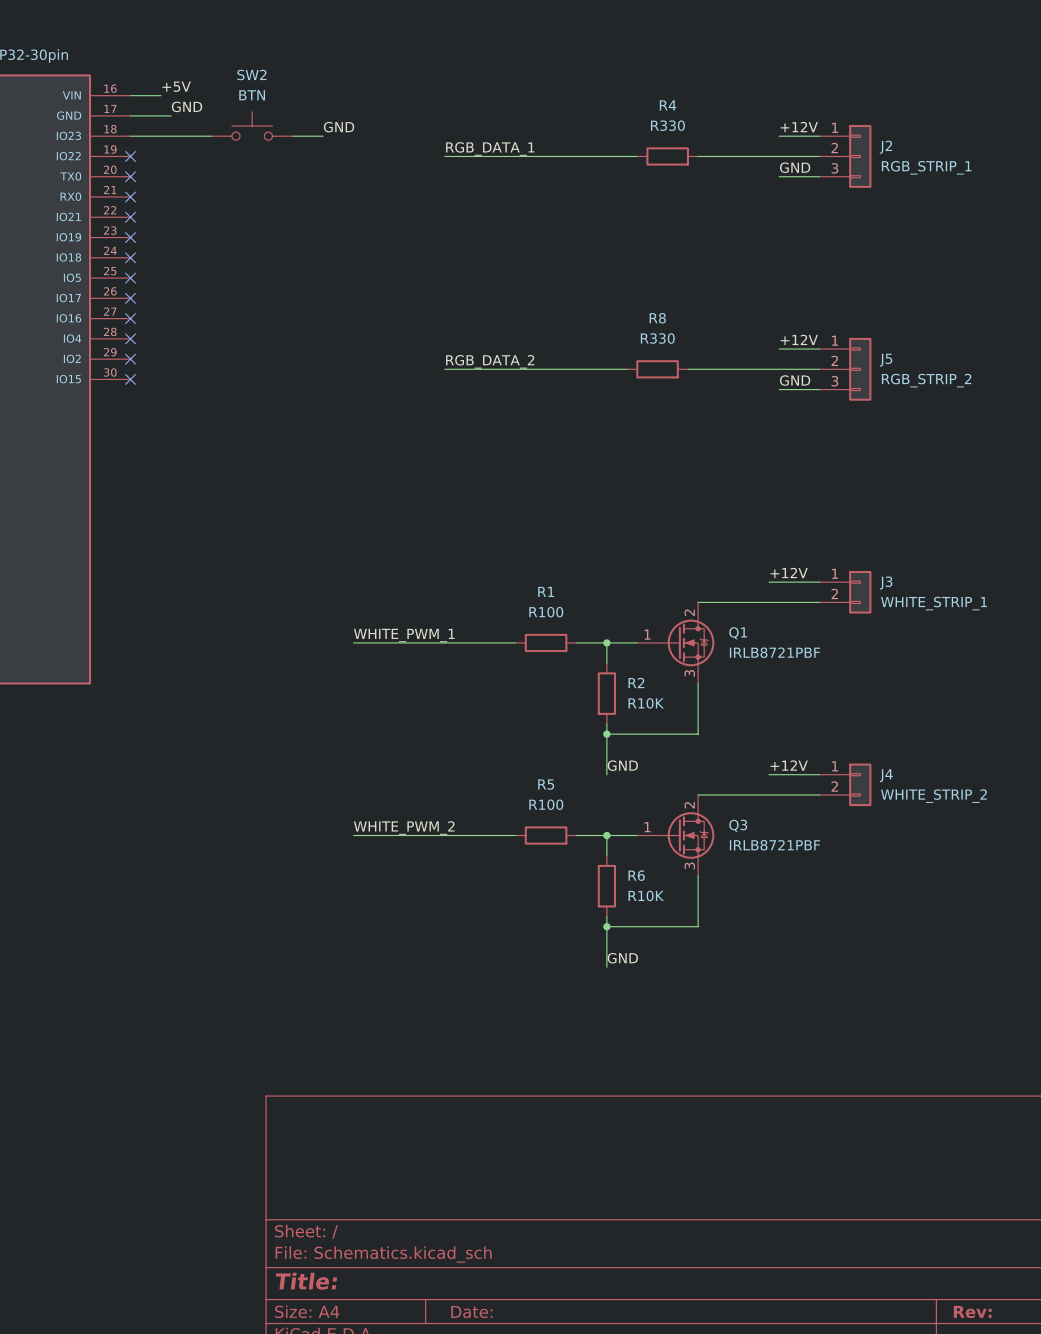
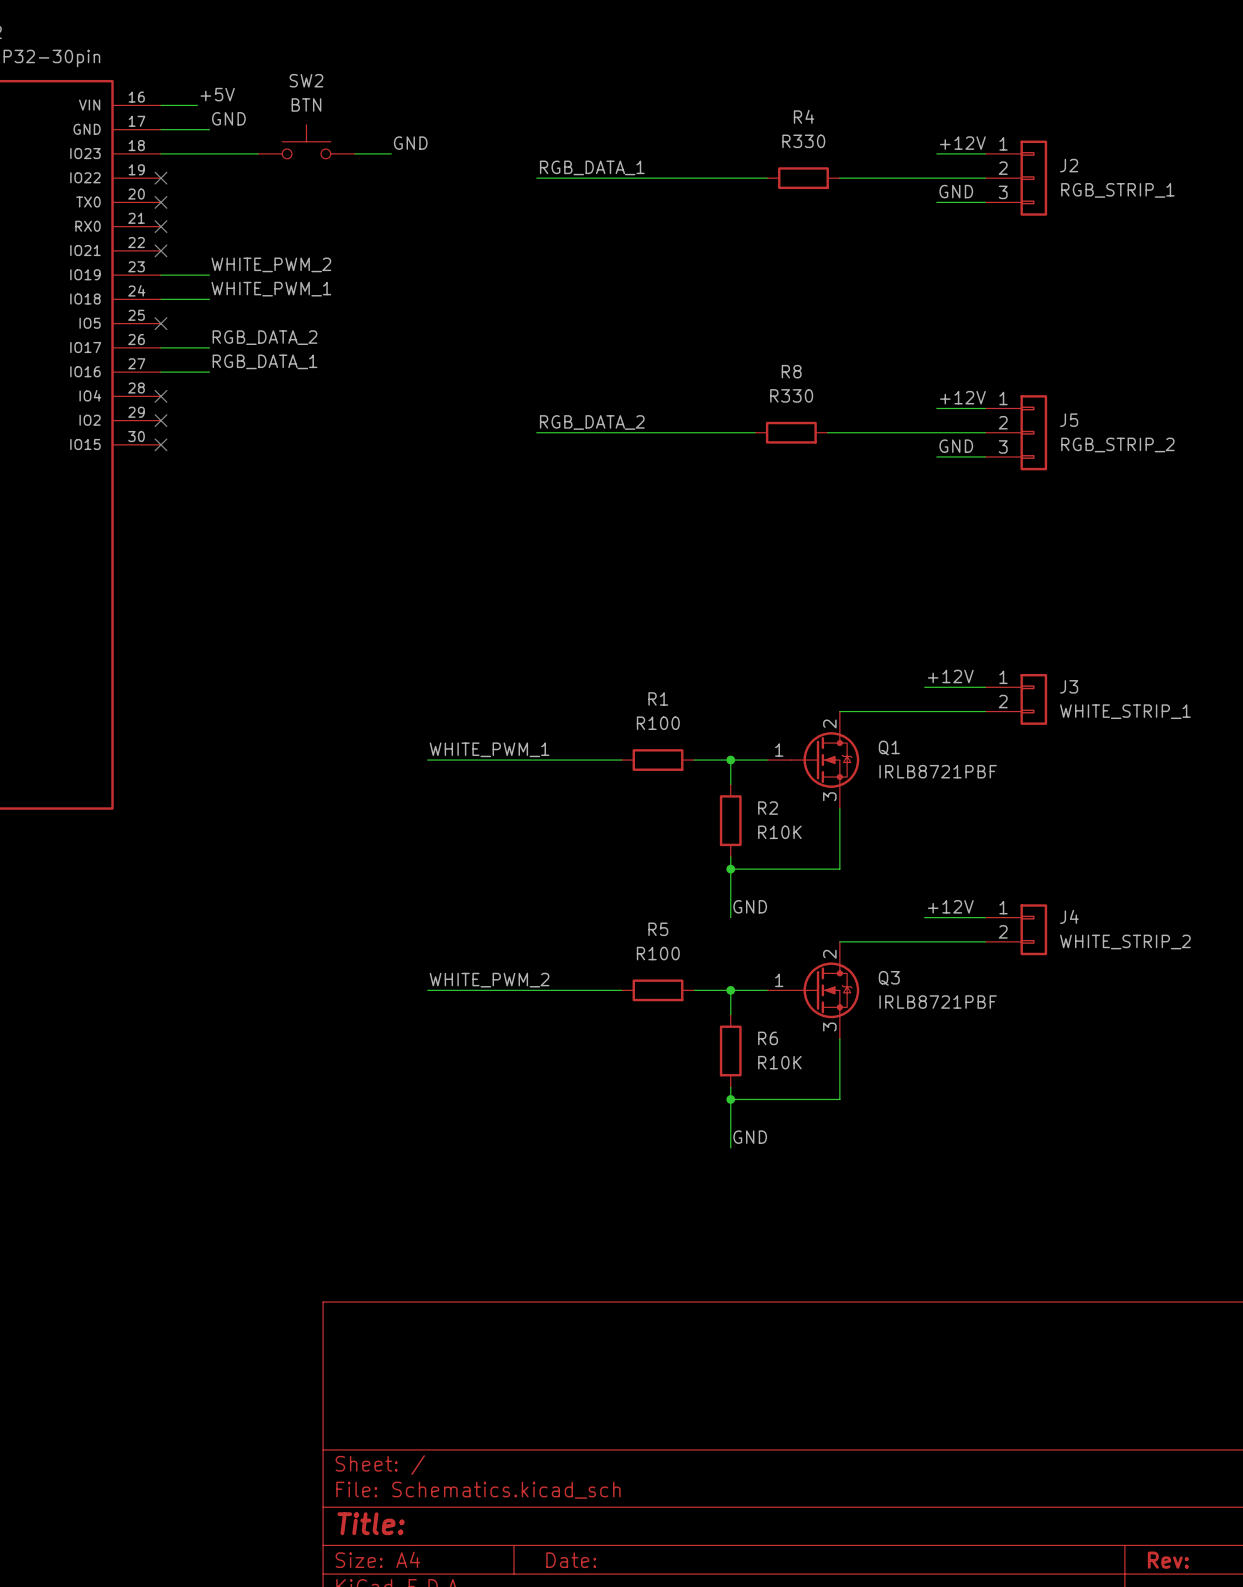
label: none -> WHITE_PWM_2 (271, 264)
wire: none -> (160, 275) (209, 275)
no-connect mark: (130, 237) -> none
label: none -> WHITE_PWM_1 (271, 289)
wire: none -> (160, 299) (209, 299)
no-connect mark: (130, 257) -> none
label: none -> RGB_DATA_2 (264, 337)
wire: none -> (160, 347) (209, 347)
no-connect mark: (130, 298) -> none
label: none -> RGB_DATA_1 (264, 361)
wire: none -> (160, 372) (209, 372)
no-connect mark: (130, 318) -> none

